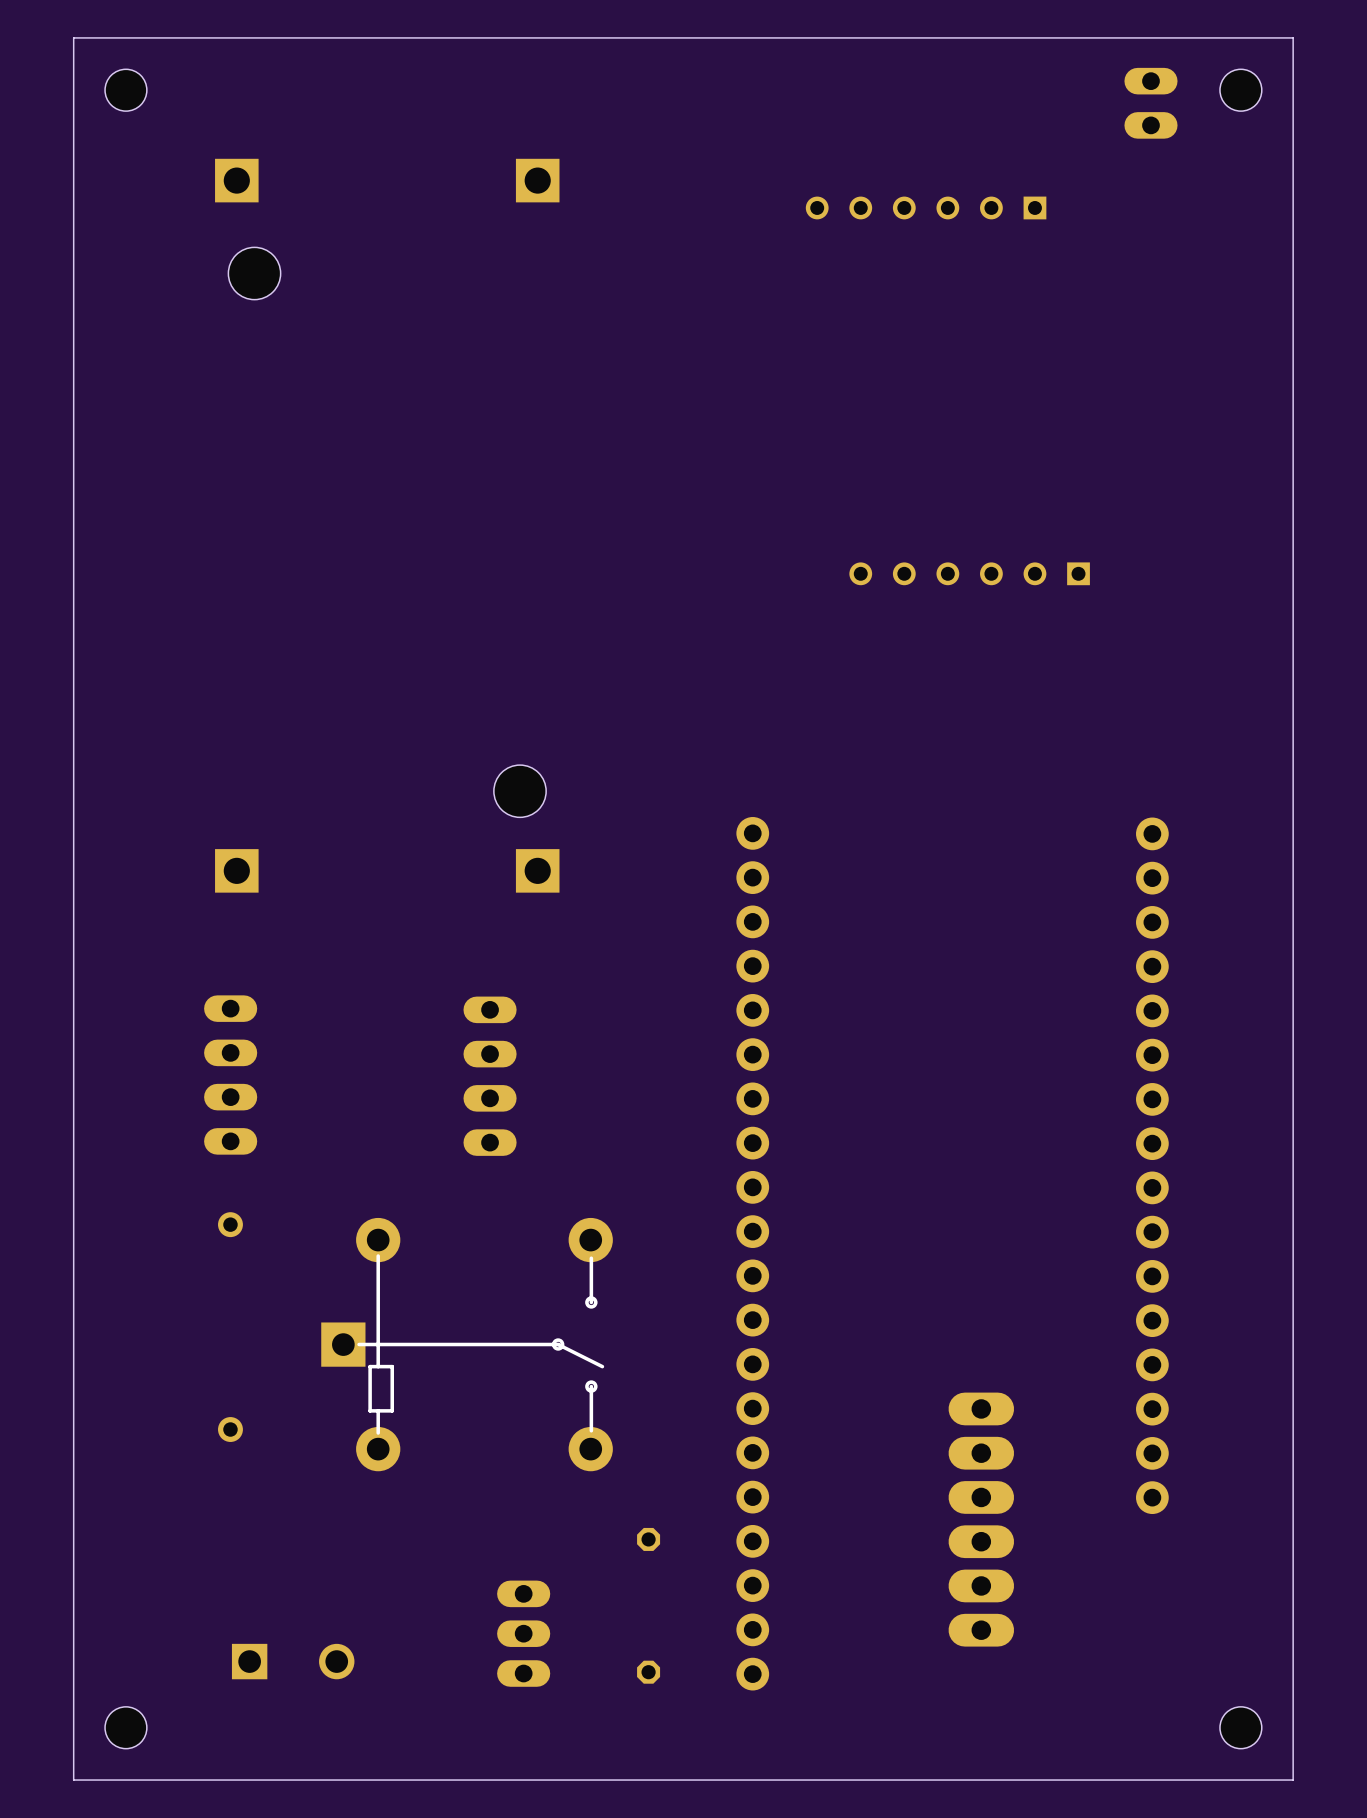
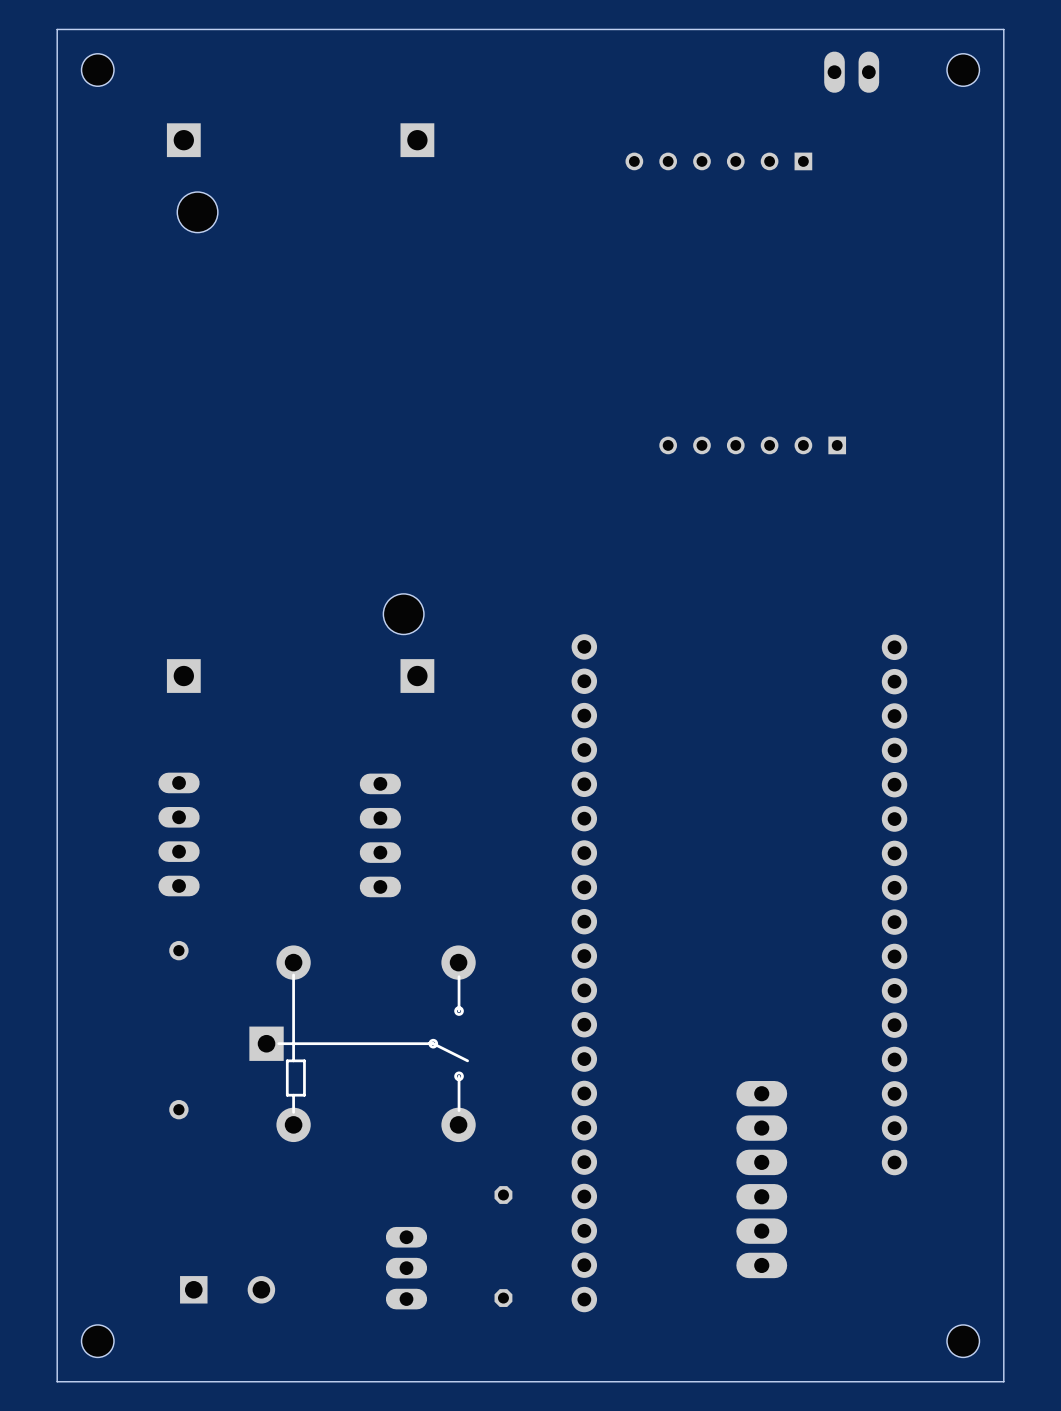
part rotation: 0° (1150, 103) -> 90° clockwise (851, 72)
part position: (1150, 103) -> (851, 72)

